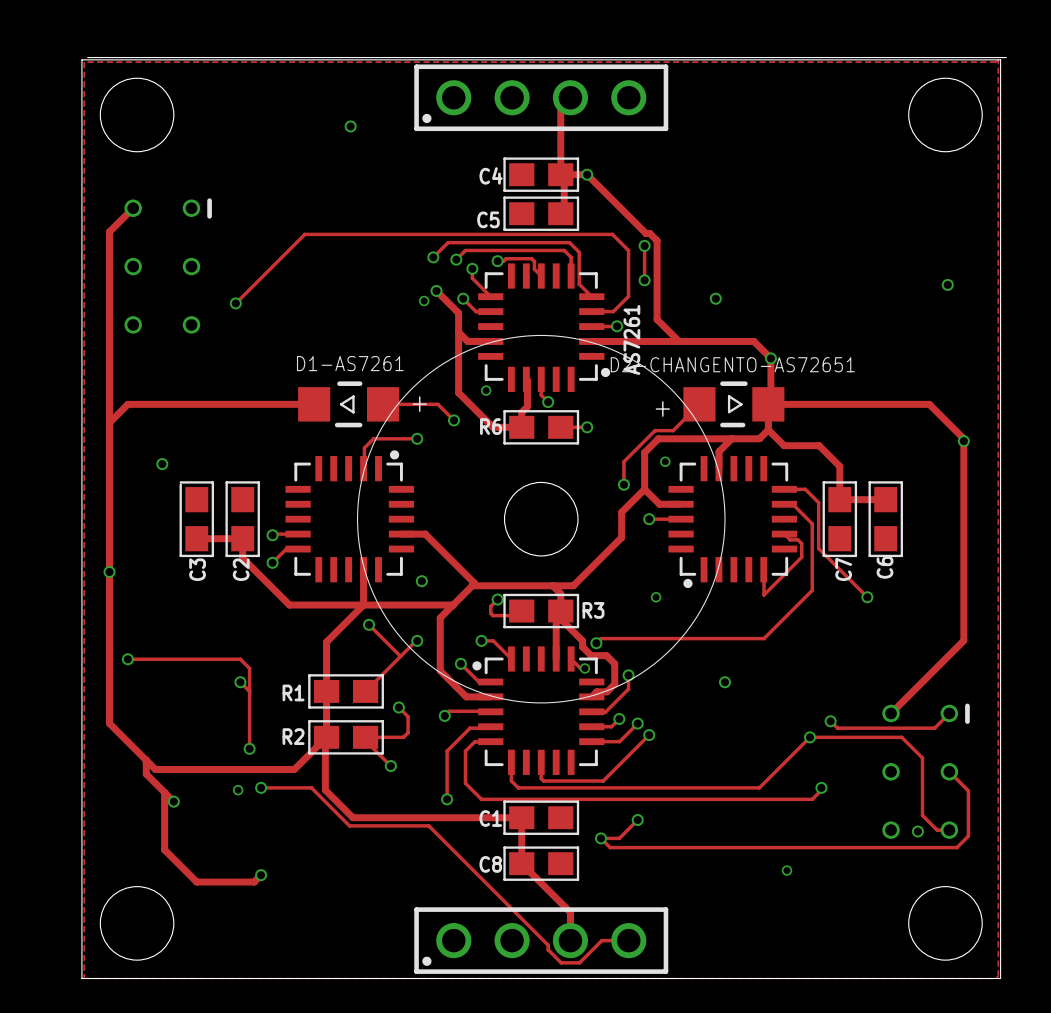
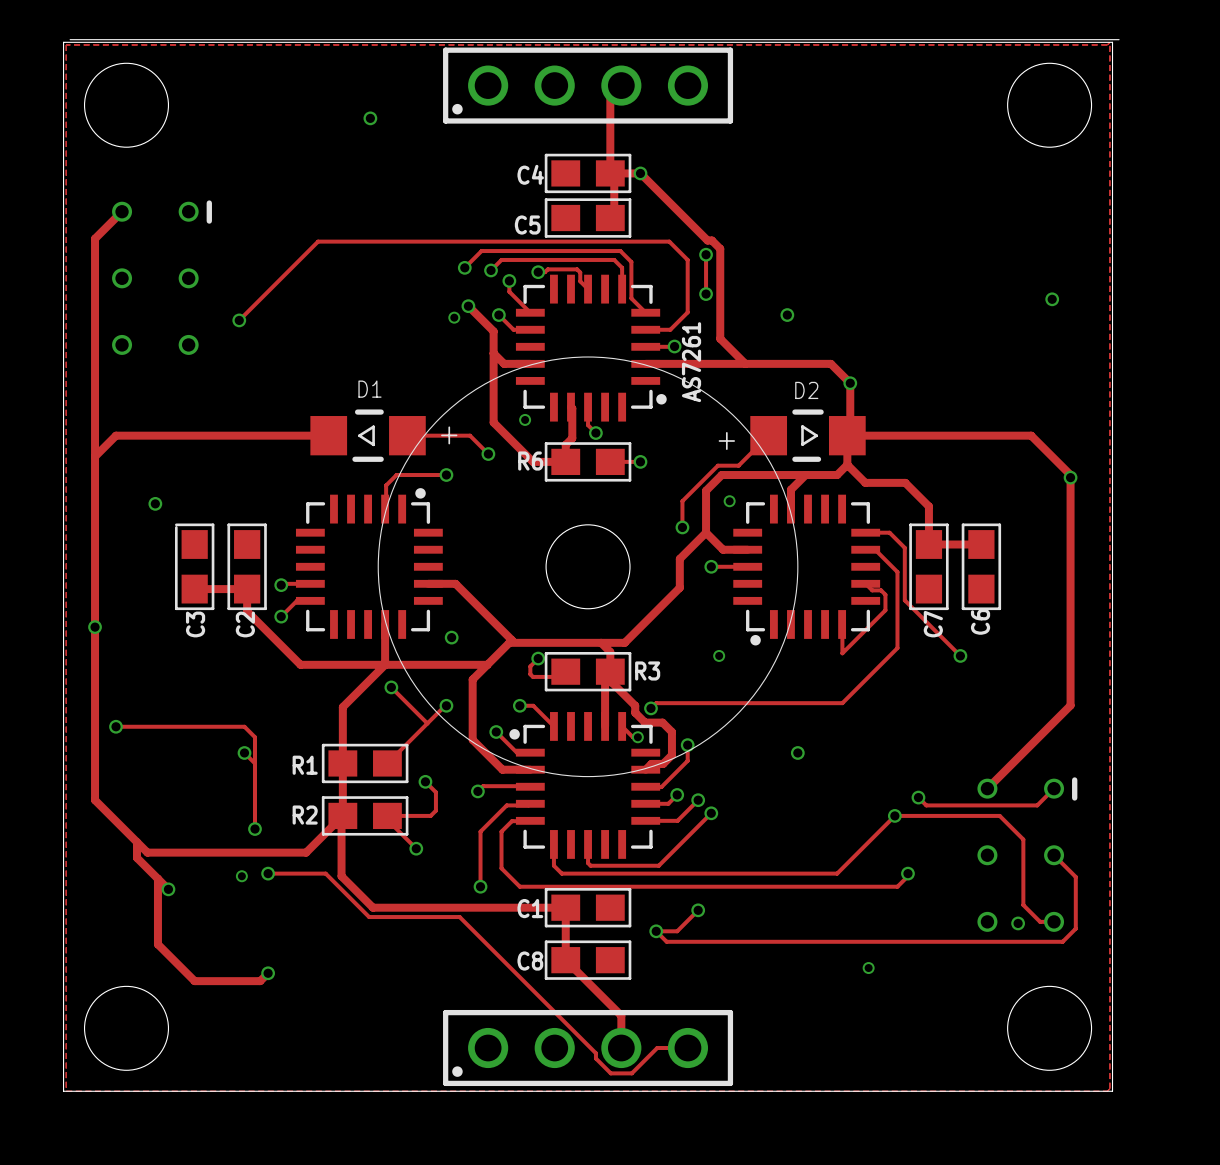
D1-AS7261 name: D1-AS7261 (350, 363) -> D1 (369, 389)
D2-CHANGENTO-AS72651 name: D2-CHANGENTO-AS72651 (732, 364) -> D2 (806, 390)

